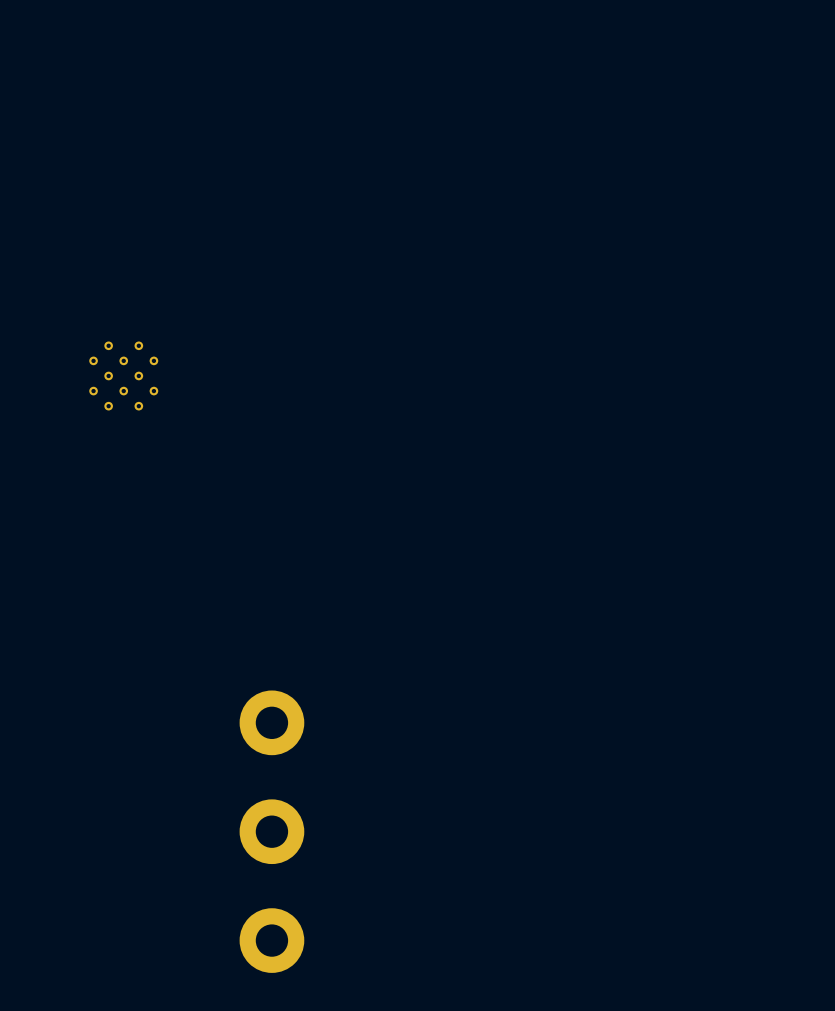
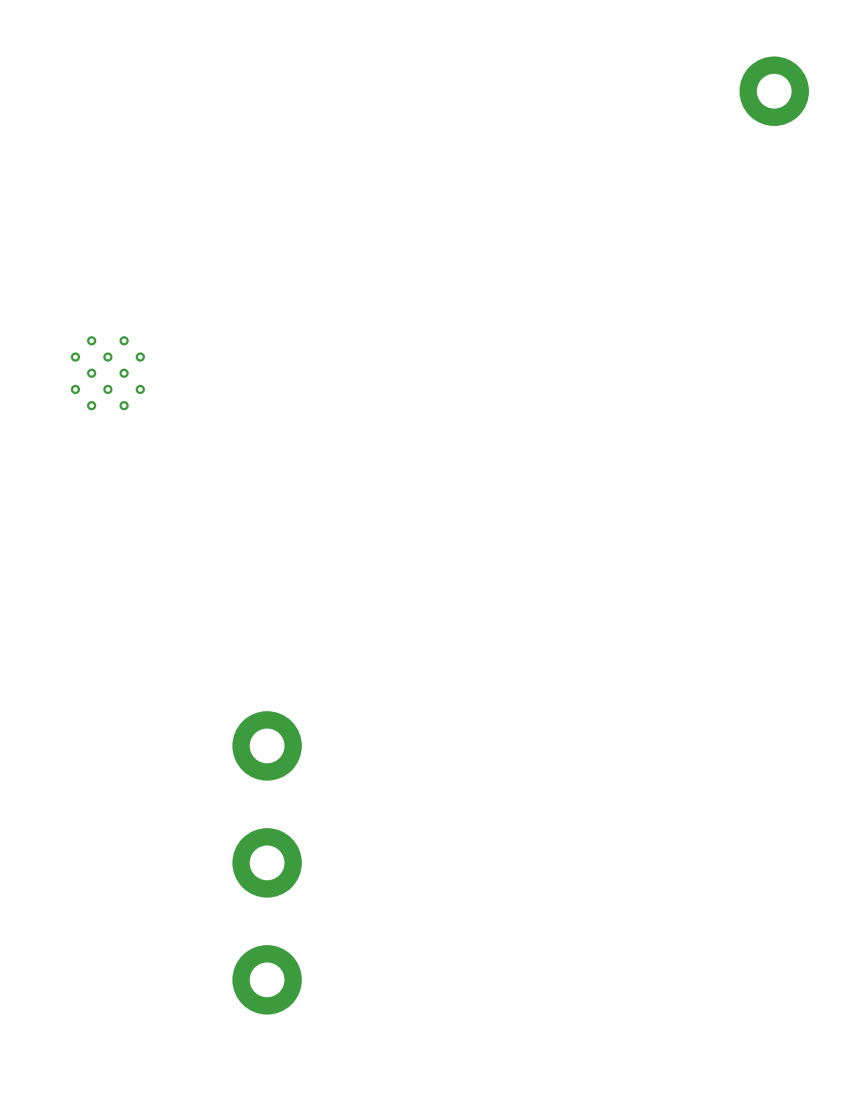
part: none -> (774, 91)

